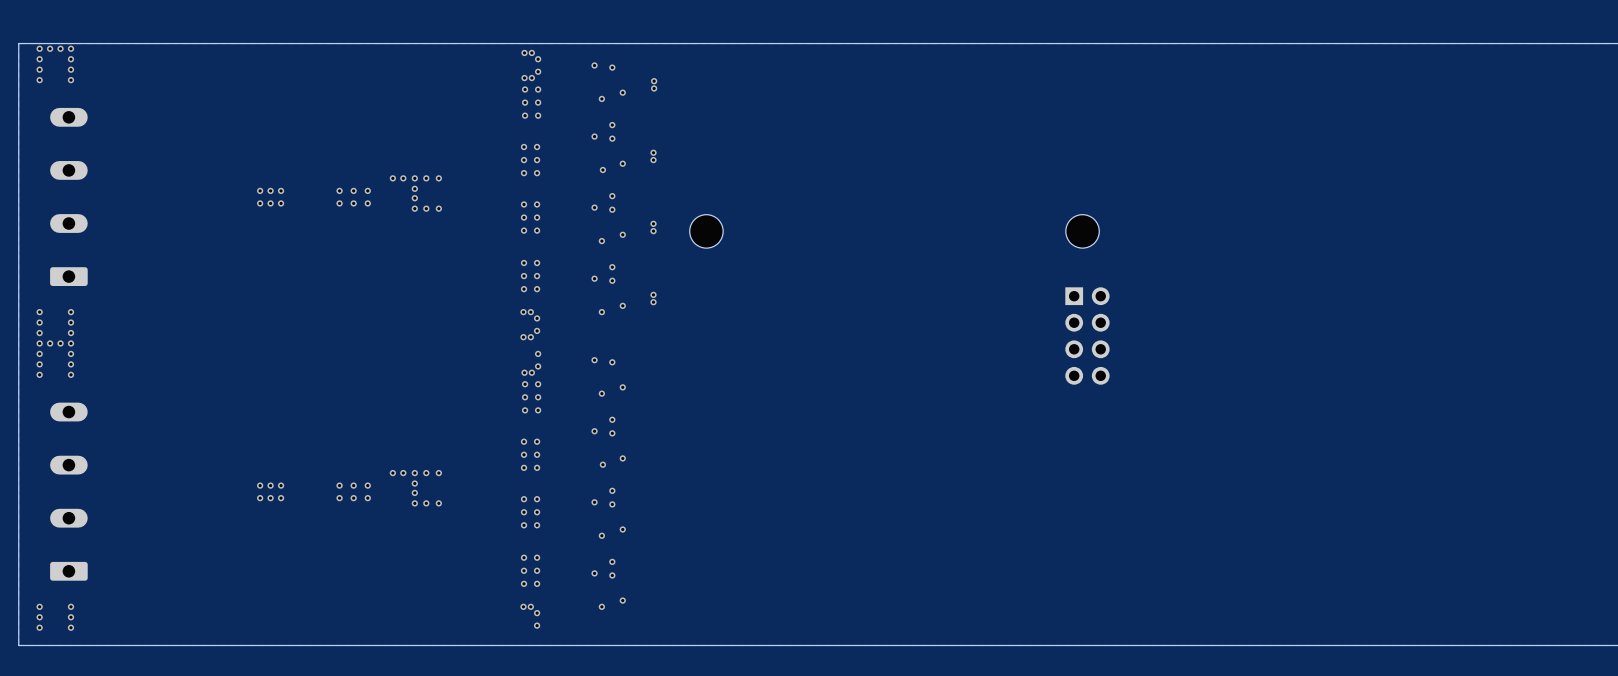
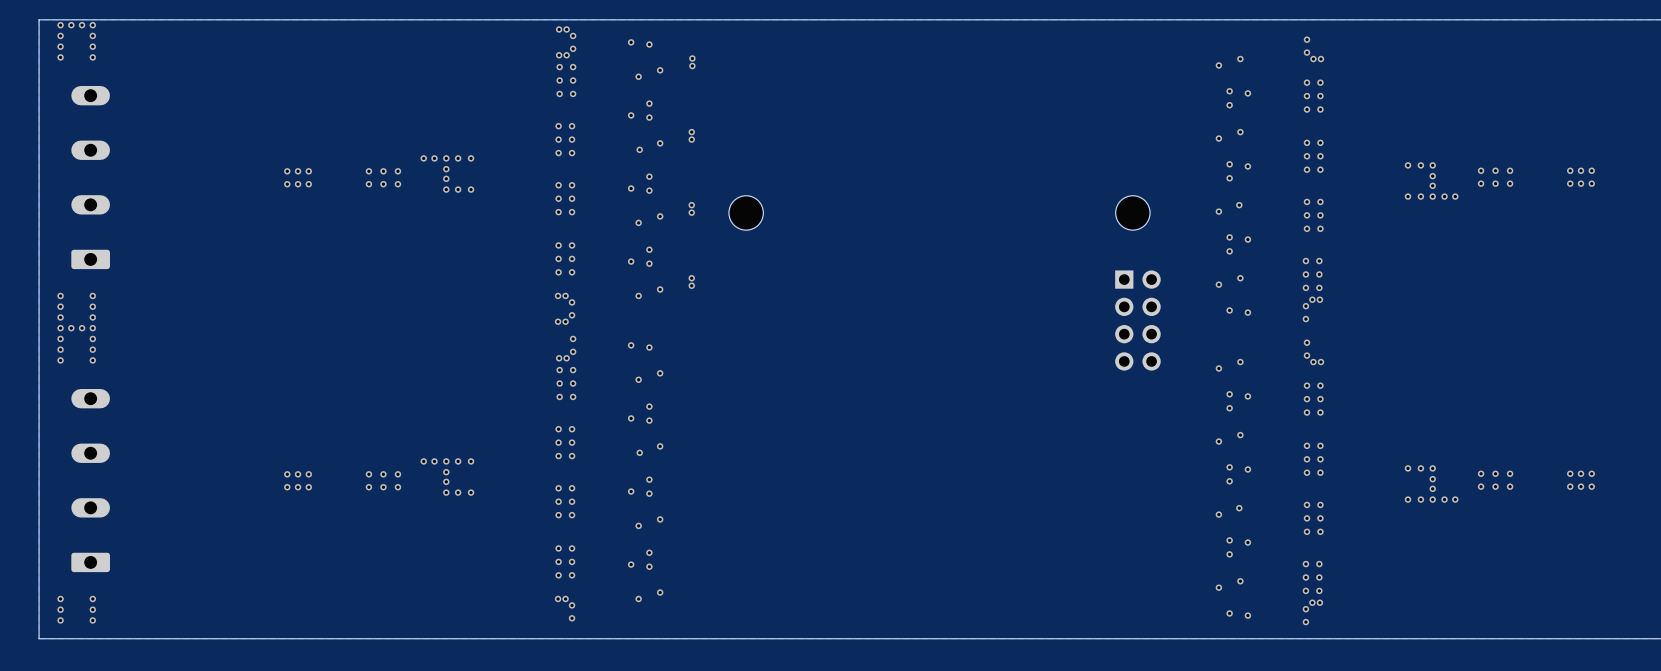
via: none -> (1307, 39)
via: none -> (1307, 52)
via: none -> (1240, 59)
via: none -> (1313, 59)
via: none -> (1320, 59)
via: none -> (1218, 65)
via: none -> (1307, 82)
via: none -> (1320, 82)
via: none -> (1229, 91)
via: none -> (1247, 93)
via: none -> (1307, 96)
via: none -> (1320, 96)
via: none -> (1229, 105)
via: none -> (1307, 109)
via: none -> (1320, 109)
via: none -> (1240, 132)
via: none -> (1218, 138)
via: none -> (1307, 142)
via: none -> (1320, 142)
via: none -> (1307, 156)
via: none -> (1320, 156)
via: none -> (1229, 164)
via: none -> (1408, 165)
via: none -> (1420, 165)
via: none -> (1432, 165)
via: none -> (1247, 166)
via: none -> (1307, 169)
via: none -> (1320, 169)
via: none -> (1481, 170)
via: none -> (1495, 170)
via: none -> (1510, 170)
via: none -> (1570, 170)
via: none -> (1581, 170)
via: none -> (1591, 170)
via: none -> (1432, 176)
via: none -> (1229, 178)
via: none -> (1481, 183)
via: none -> (1495, 183)
via: none -> (1510, 183)
via: none -> (1570, 183)
via: none -> (1581, 183)
via: none -> (1591, 183)
via: none -> (1432, 185)
via: none -> (1408, 196)
via: none -> (1420, 196)
via: none -> (1432, 196)
via: none -> (1444, 196)
via: none -> (1455, 196)
via: none -> (1307, 201)
via: none -> (1320, 201)
via: none -> (1239, 205)
via: none -> (1218, 211)
via: none -> (1307, 215)
via: none -> (1320, 215)
via: none -> (1307, 228)
via: none -> (1320, 228)
via: none -> (1229, 237)
via: none -> (1247, 239)
via: none -> (1229, 251)
via: none -> (1305, 261)
via: none -> (1319, 261)
via: none -> (1305, 274)
via: none -> (1319, 274)
via: none -> (1240, 278)
via: none -> (1218, 284)
via: none -> (1305, 287)
via: none -> (1319, 287)
via: none -> (1312, 299)
via: none -> (1319, 299)
via: none -> (1305, 306)
via: none -> (1229, 310)
via: none -> (1247, 312)
via: none -> (1305, 319)
via: none -> (1307, 342)
via: none -> (1307, 355)
via: none -> (1240, 362)
via: none -> (1313, 362)
via: none -> (1320, 362)
via: none -> (1218, 368)
via: none -> (1307, 385)
via: none -> (1320, 385)
via: none -> (1229, 394)
via: none -> (1247, 396)
via: none -> (1307, 399)
via: none -> (1320, 399)
via: none -> (1229, 408)
via: none -> (1307, 412)
via: none -> (1320, 412)
via: none -> (1240, 435)
via: none -> (1218, 441)
via: none -> (1307, 445)
via: none -> (1320, 445)
via: none -> (1307, 459)
via: none -> (1320, 459)
via: none -> (1229, 467)
via: none -> (1408, 468)
via: none -> (1420, 468)
via: none -> (1432, 468)
via: none -> (1247, 469)
via: none -> (1307, 472)
via: none -> (1320, 472)
via: none -> (1481, 473)
via: none -> (1495, 473)
via: none -> (1510, 473)
via: none -> (1570, 473)
via: none -> (1581, 473)
via: none -> (1591, 473)
via: none -> (1432, 479)
via: none -> (1229, 481)
via: none -> (1481, 486)
via: none -> (1495, 486)
via: none -> (1510, 486)
via: none -> (1570, 486)
via: none -> (1581, 486)
via: none -> (1591, 486)
via: none -> (1432, 488)
via: none -> (1408, 499)
via: none -> (1420, 499)
via: none -> (1432, 499)
via: none -> (1444, 499)
via: none -> (1455, 499)
via: none -> (1307, 504)
via: none -> (1320, 504)
via: none -> (1239, 508)
via: none -> (1218, 514)
via: none -> (1307, 518)
via: none -> (1320, 518)
via: none -> (1307, 531)
via: none -> (1320, 531)
via: none -> (1229, 540)
via: none -> (1247, 542)
via: none -> (1229, 554)
via: none -> (1305, 564)
via: none -> (1319, 564)
via: none -> (1305, 577)
via: none -> (1319, 577)
via: none -> (1240, 581)
via: none -> (1218, 587)
via: none -> (1305, 590)
via: none -> (1319, 590)
via: none -> (1312, 602)
via: none -> (1319, 602)
via: none -> (1305, 609)
via: none -> (1229, 613)
via: none -> (1247, 615)
via: none -> (1305, 622)

